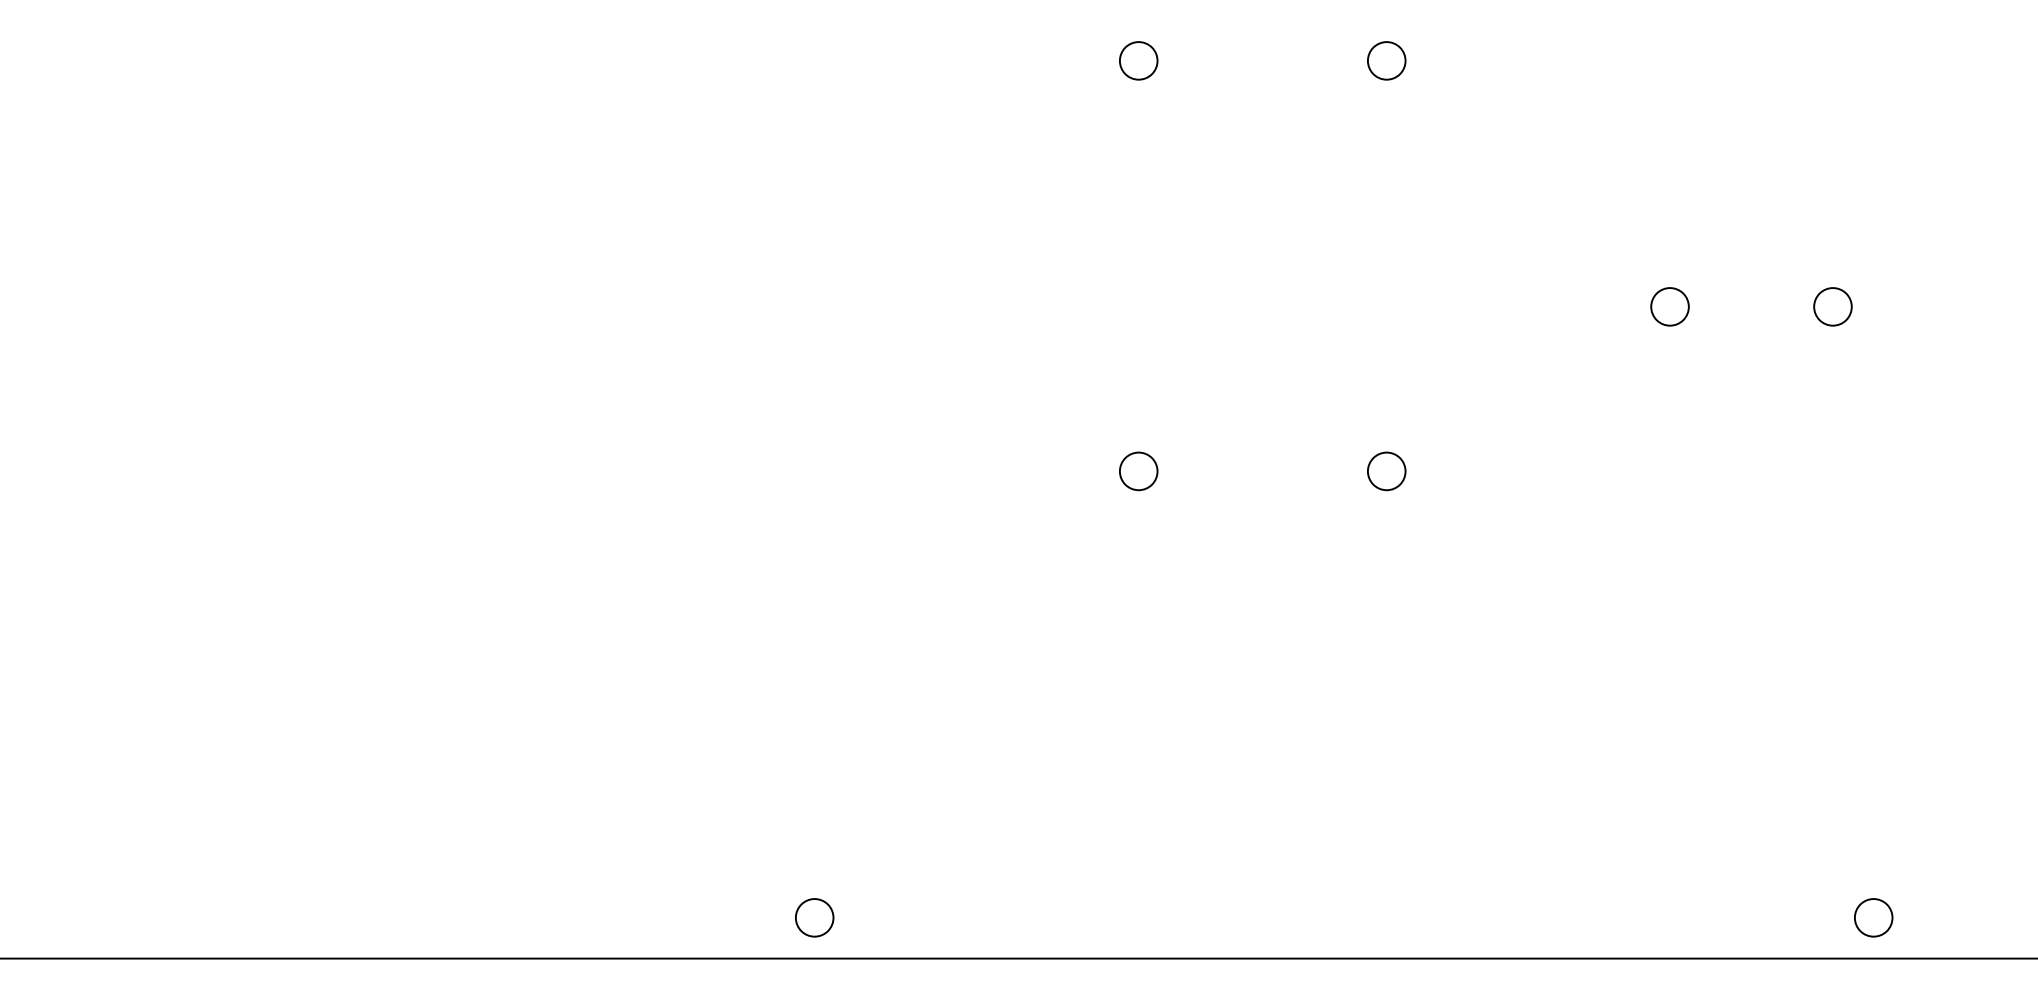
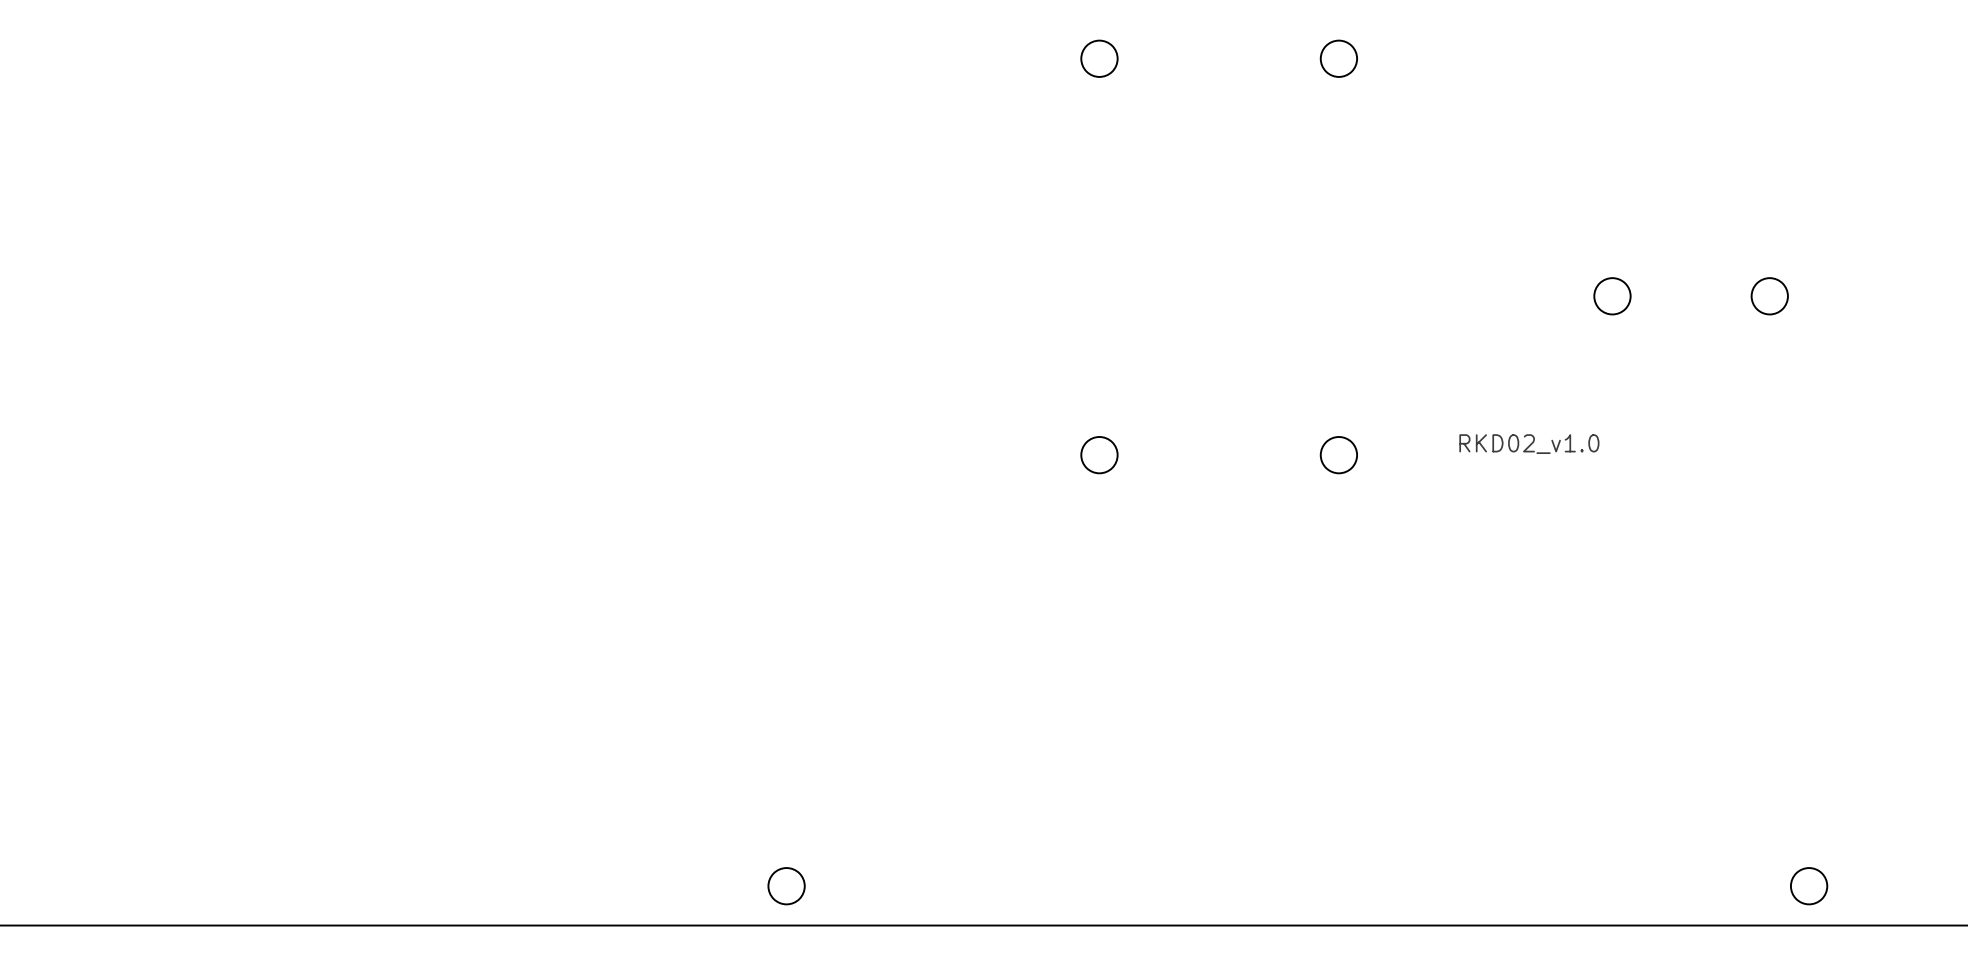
text: none -> RKD02_v1.0 (1529, 444)

